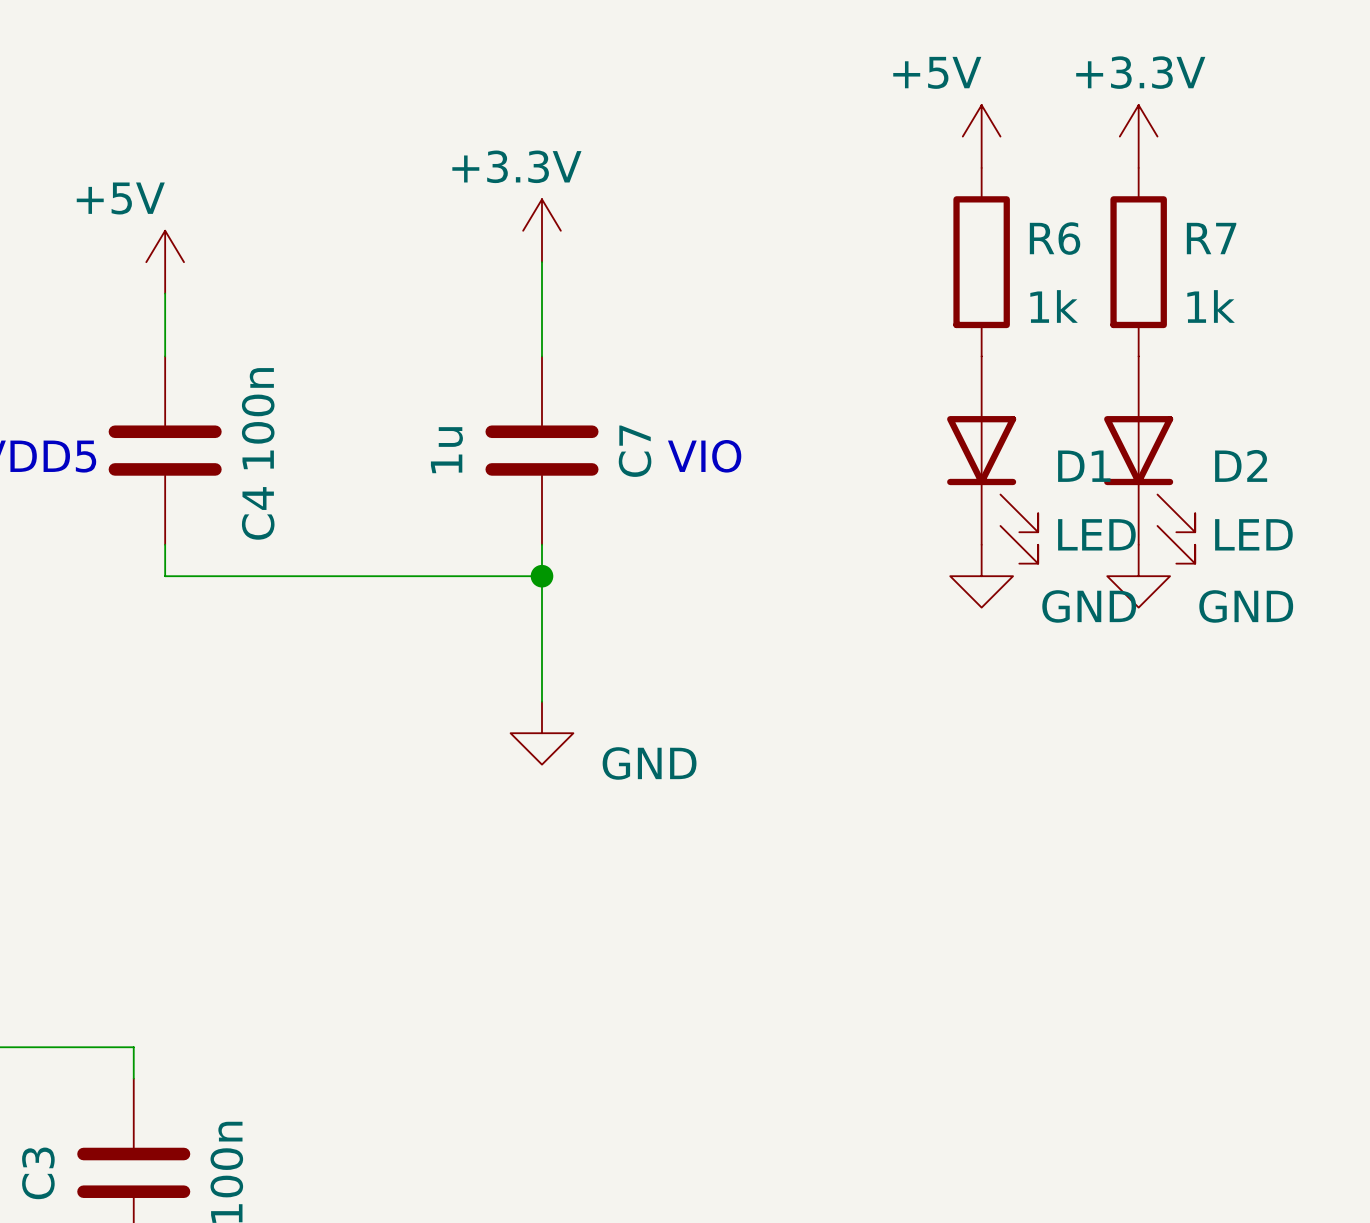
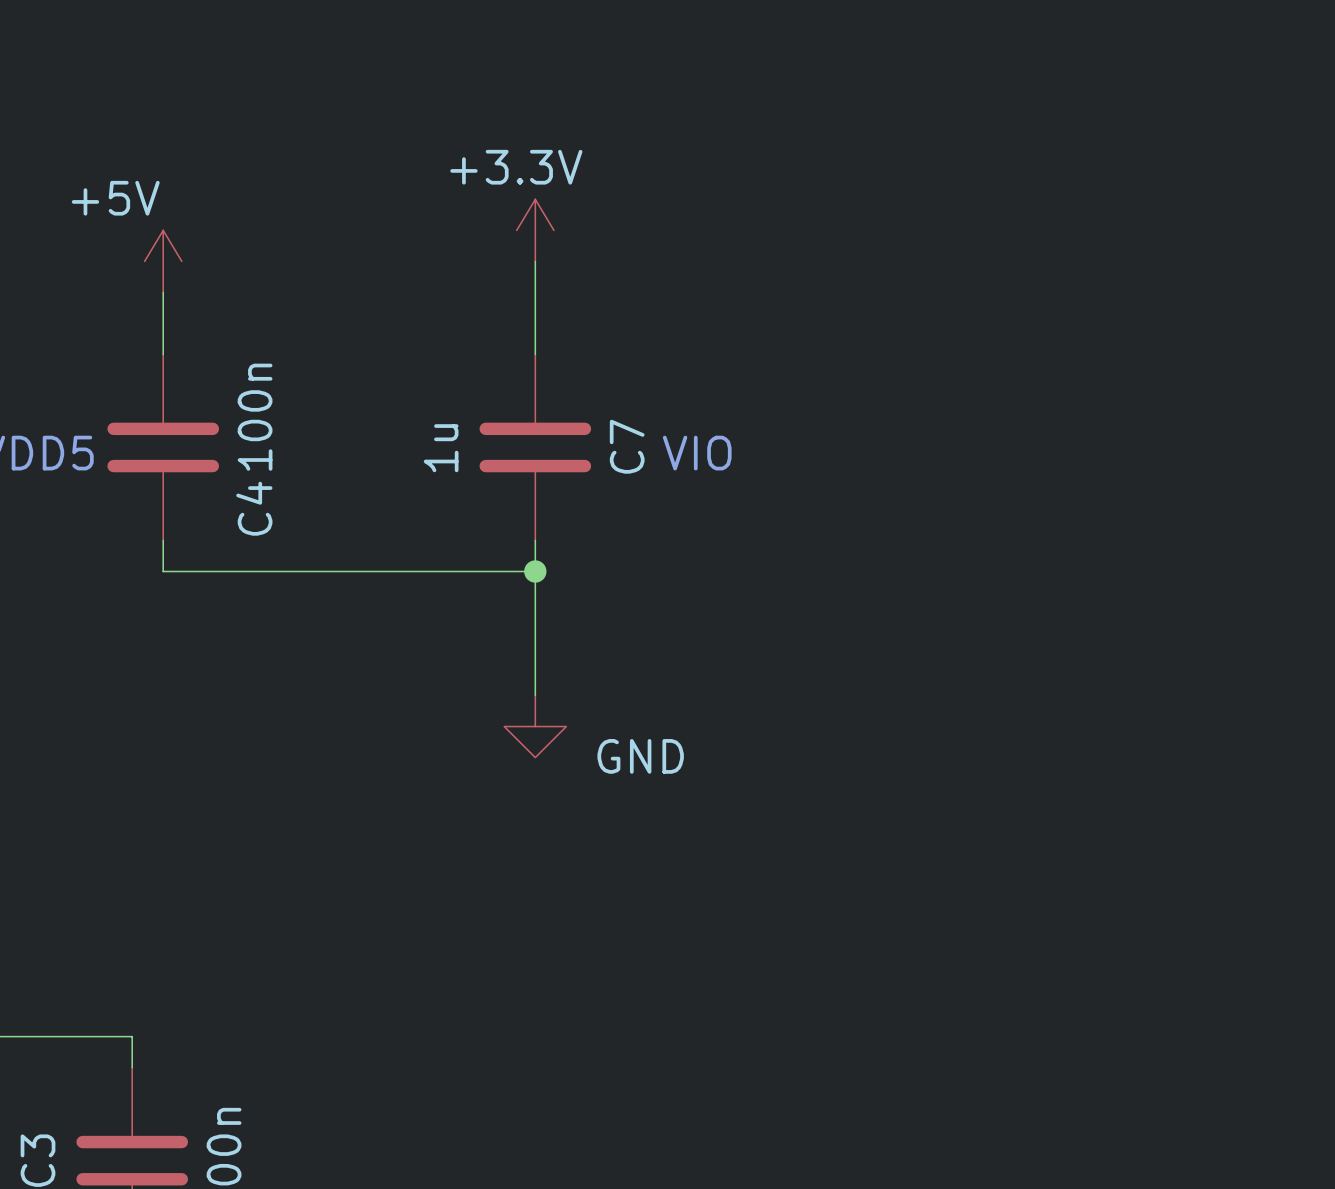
power symbol: +5V (981, 136) -> none
power symbol: +3.3V (1138, 136) -> none
R6: 1k (981, 262) -> none
R7: 1k (1138, 262) -> none
D1: LED (992, 460) -> none
D2: LED (1149, 460) -> none
power symbol: GND (981, 576) -> none
power symbol: GND (1138, 576) -> none

